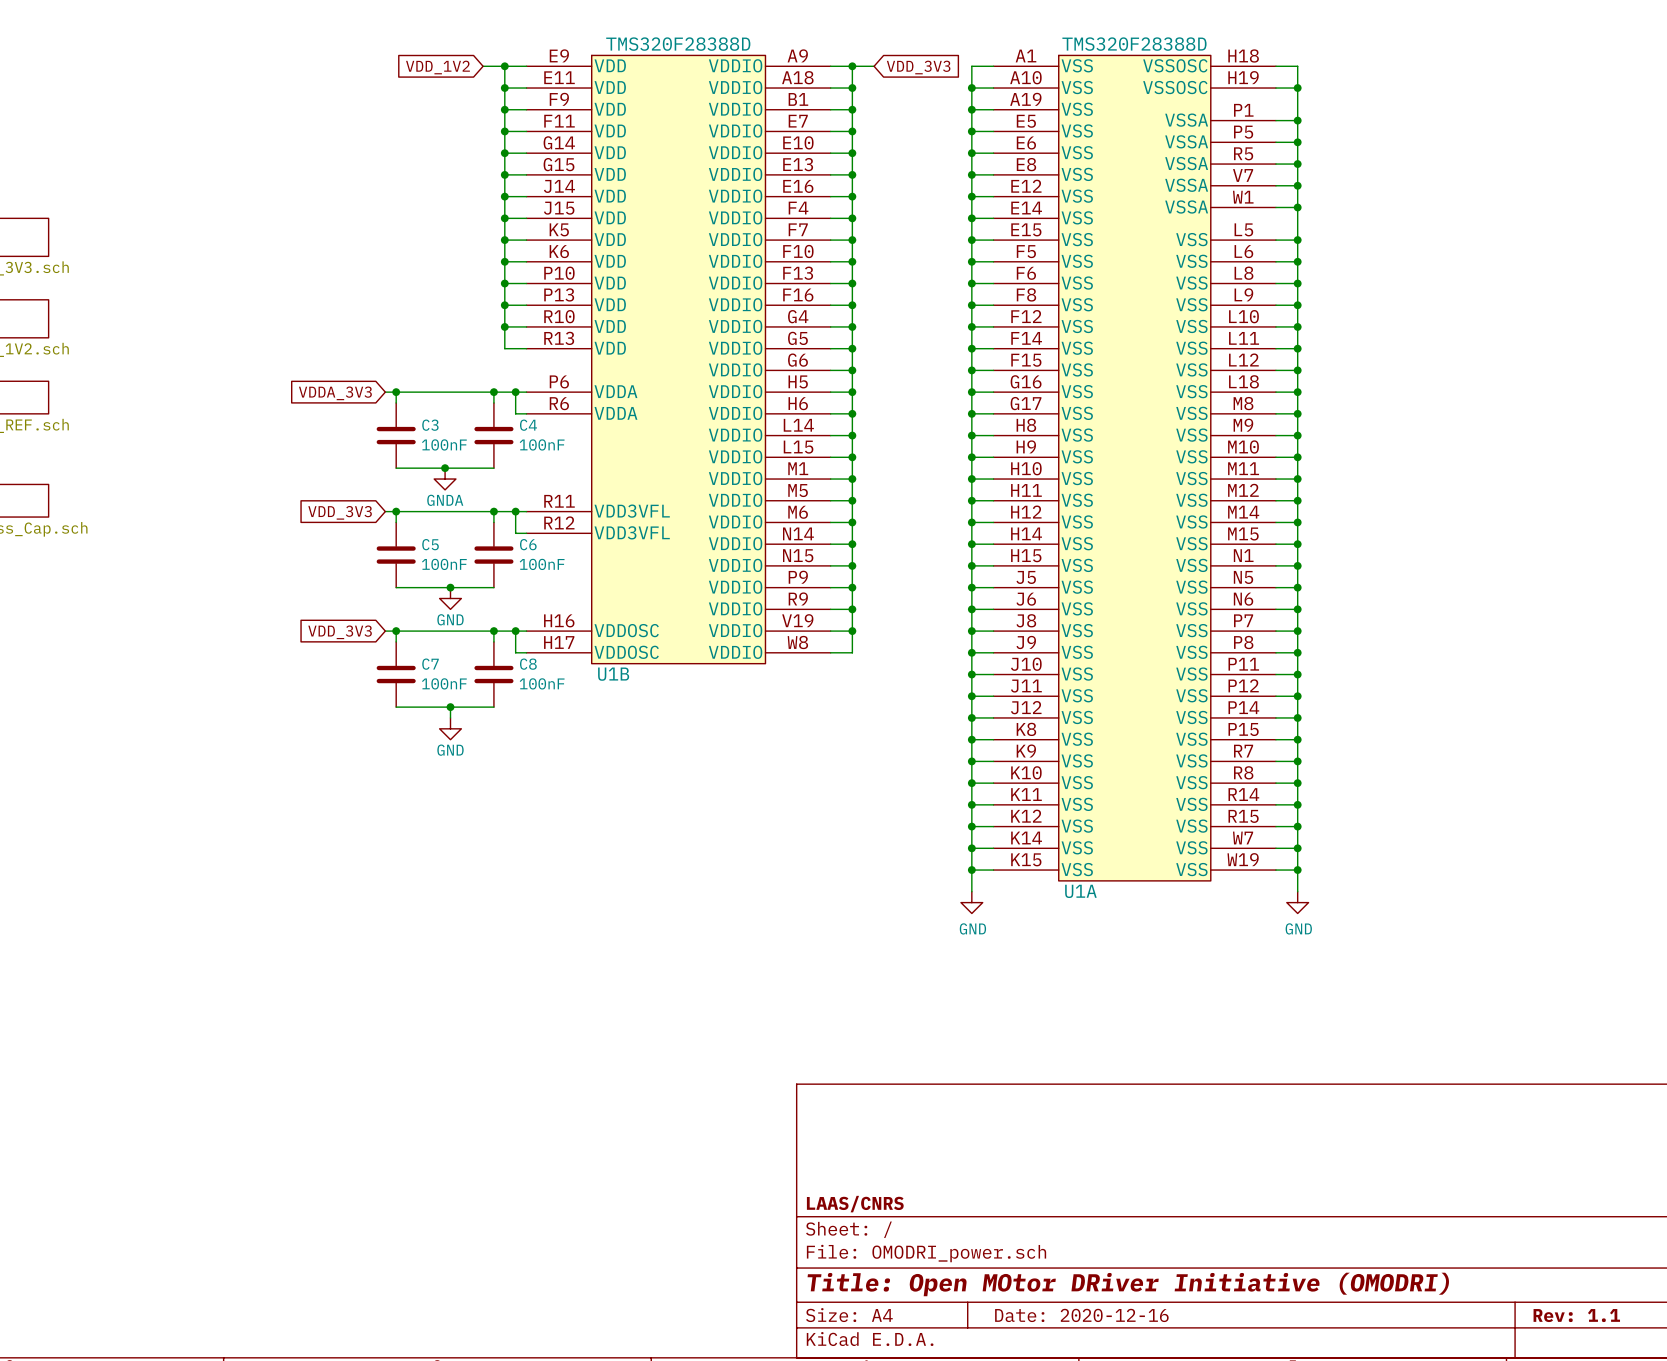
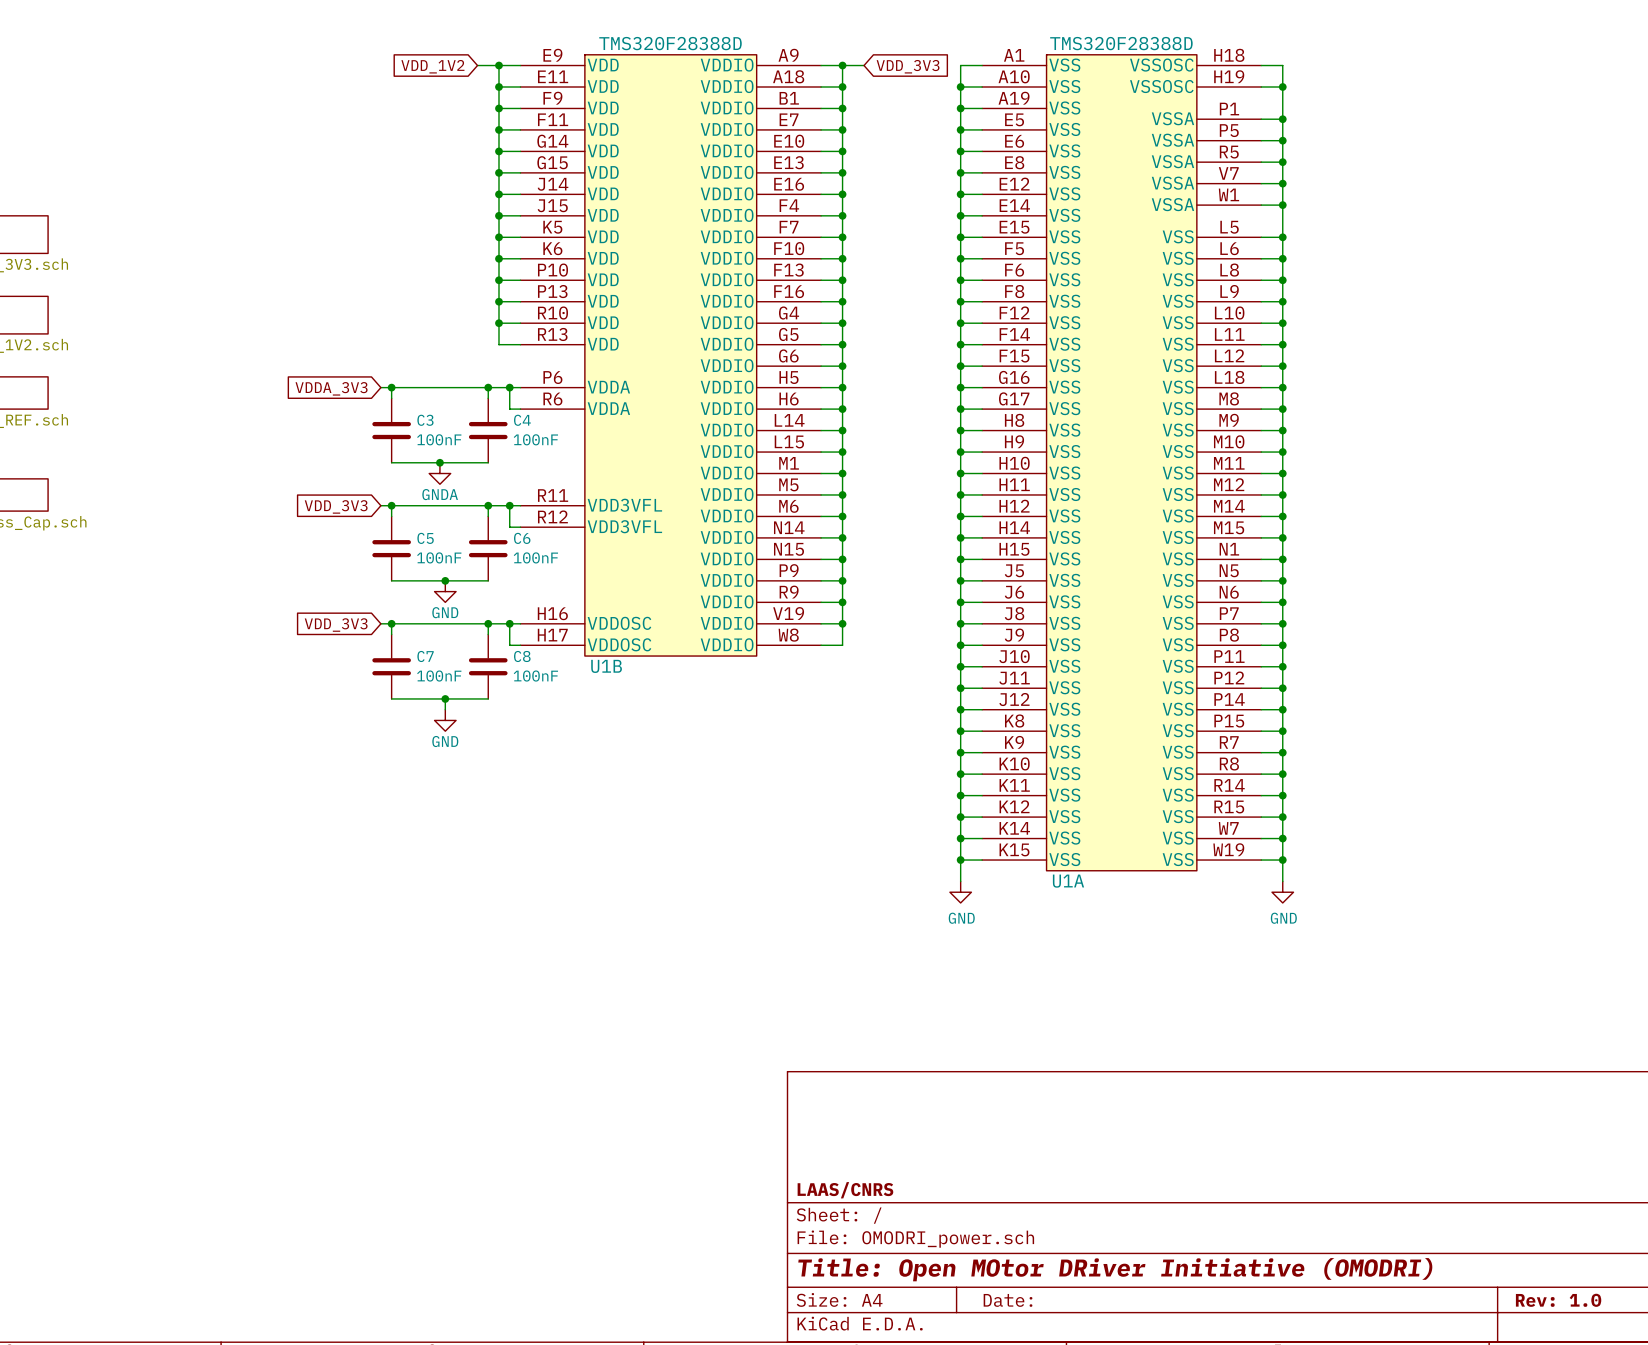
title block: Date: 2020-12-16 (1081, 1315) -> Date: (1008, 1300)
title block: Rev: 1.1 (1576, 1315) -> Rev: 1.0 (1558, 1300)

